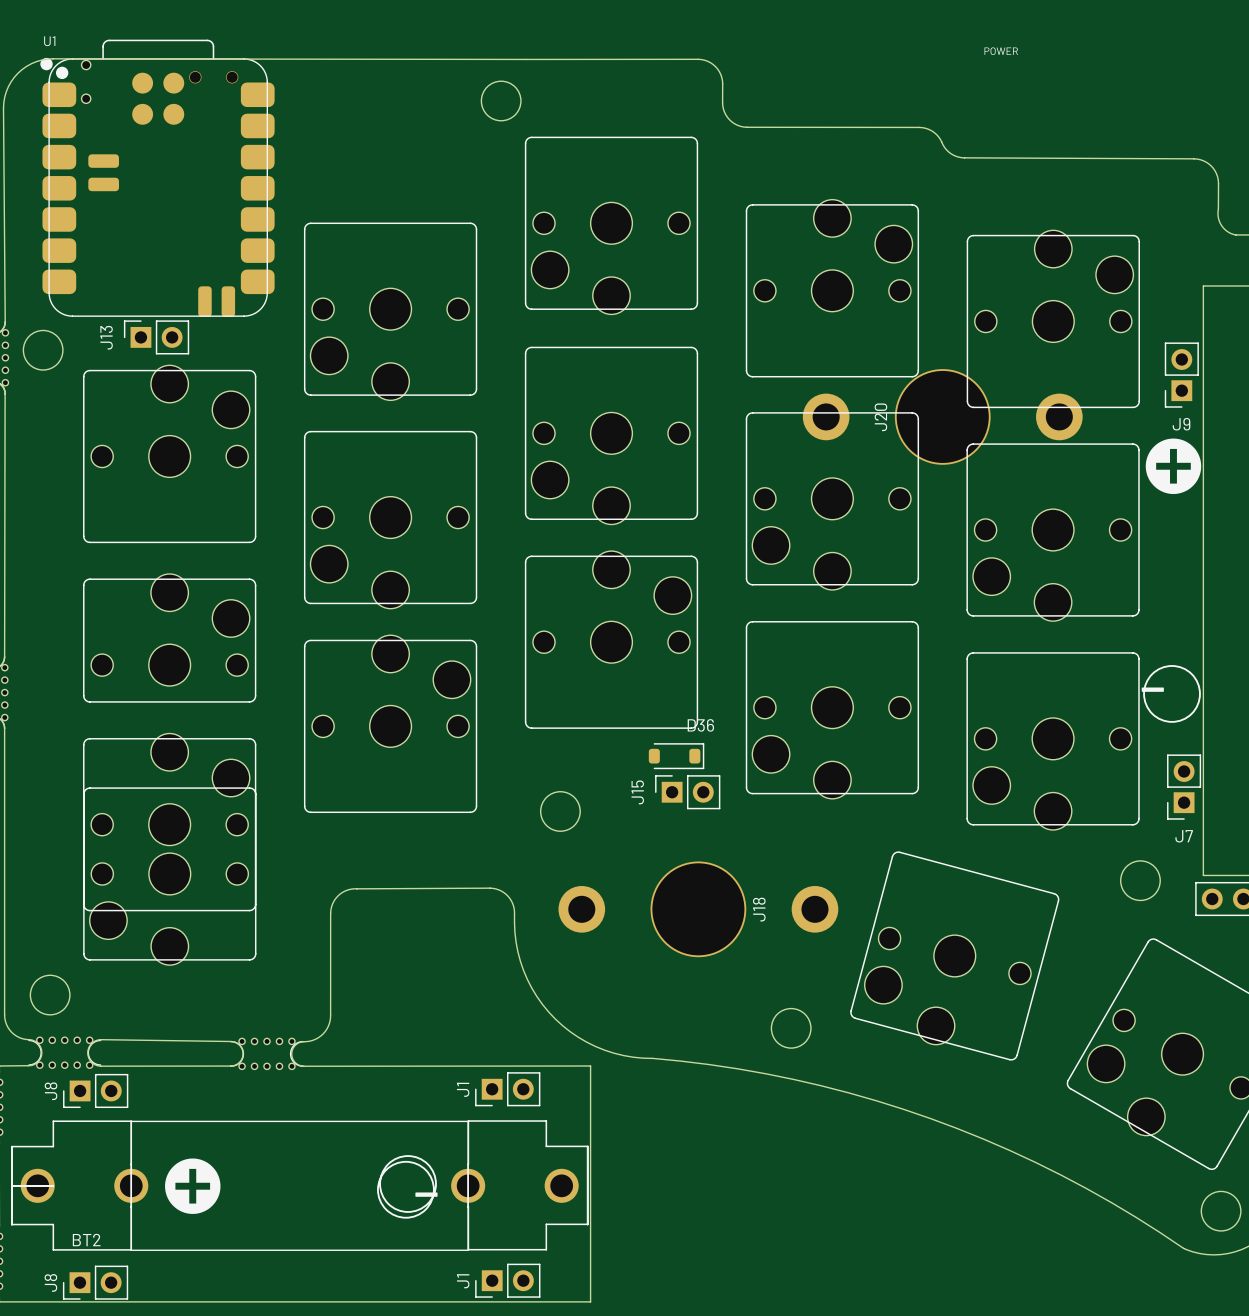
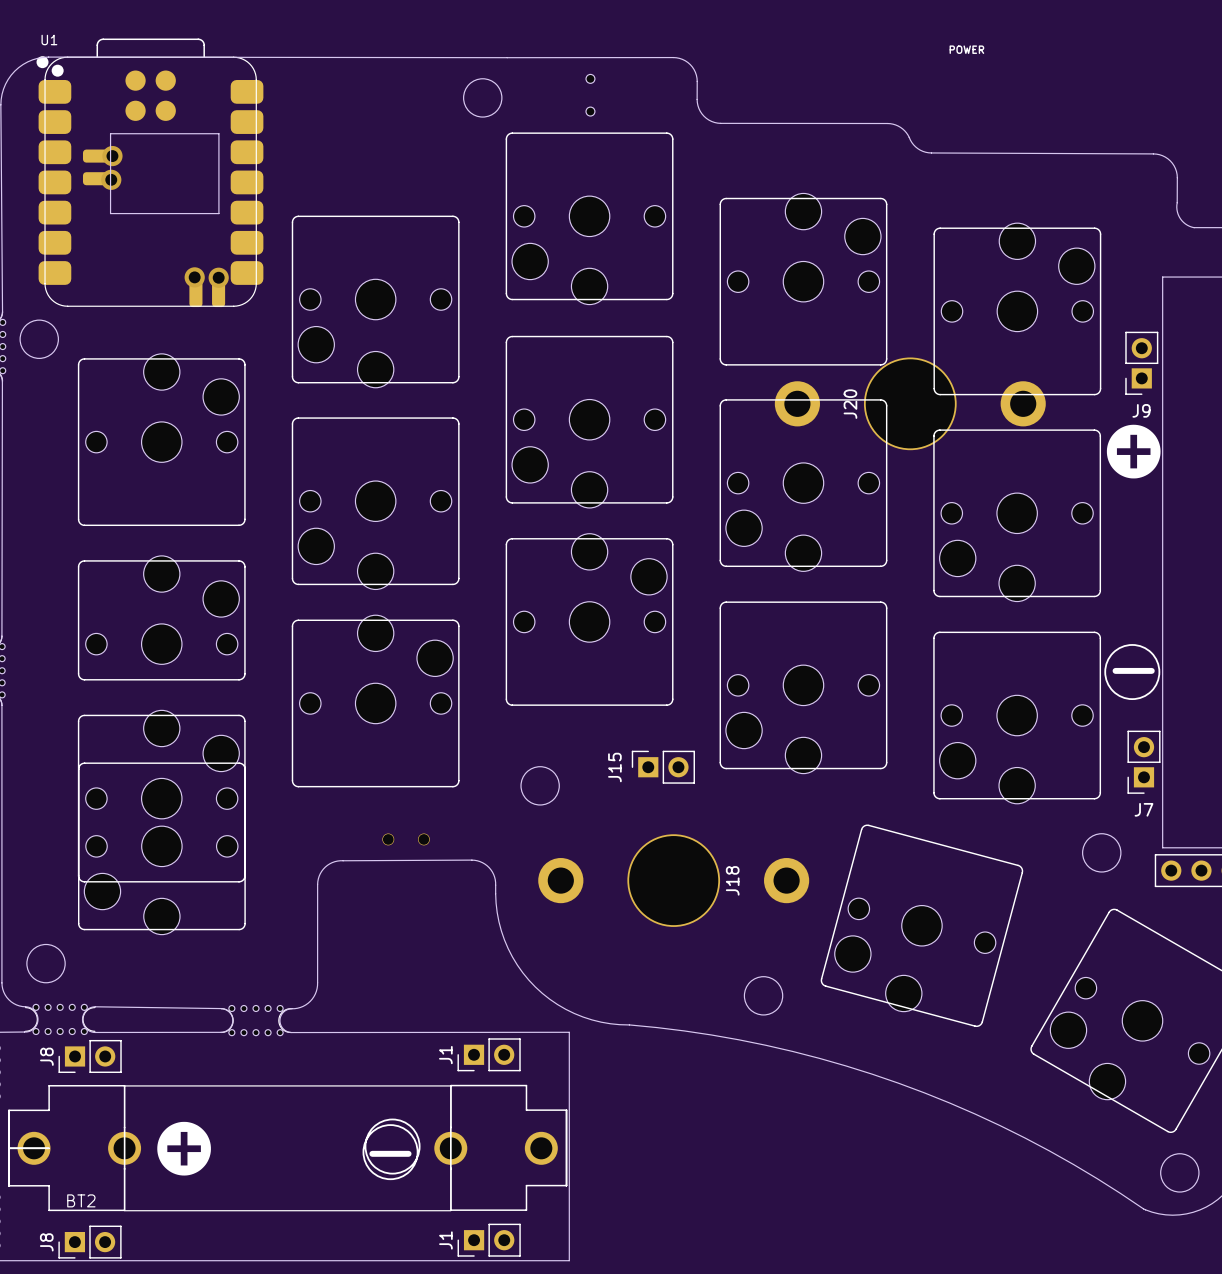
part: (213, 77) -> none
part: (86, 81) -> none
part: none -> (590, 95)
board edge: none -> (110, 133) (218, 133) (218, 213) (110, 213) (110, 133)
via: none -> (112, 156)
via: none -> (111, 179)
via: none -> (194, 277)
via: none -> (218, 277)
J13: (156, 337) -> none
D36: (676, 756) -> none
part: none -> (406, 839)

